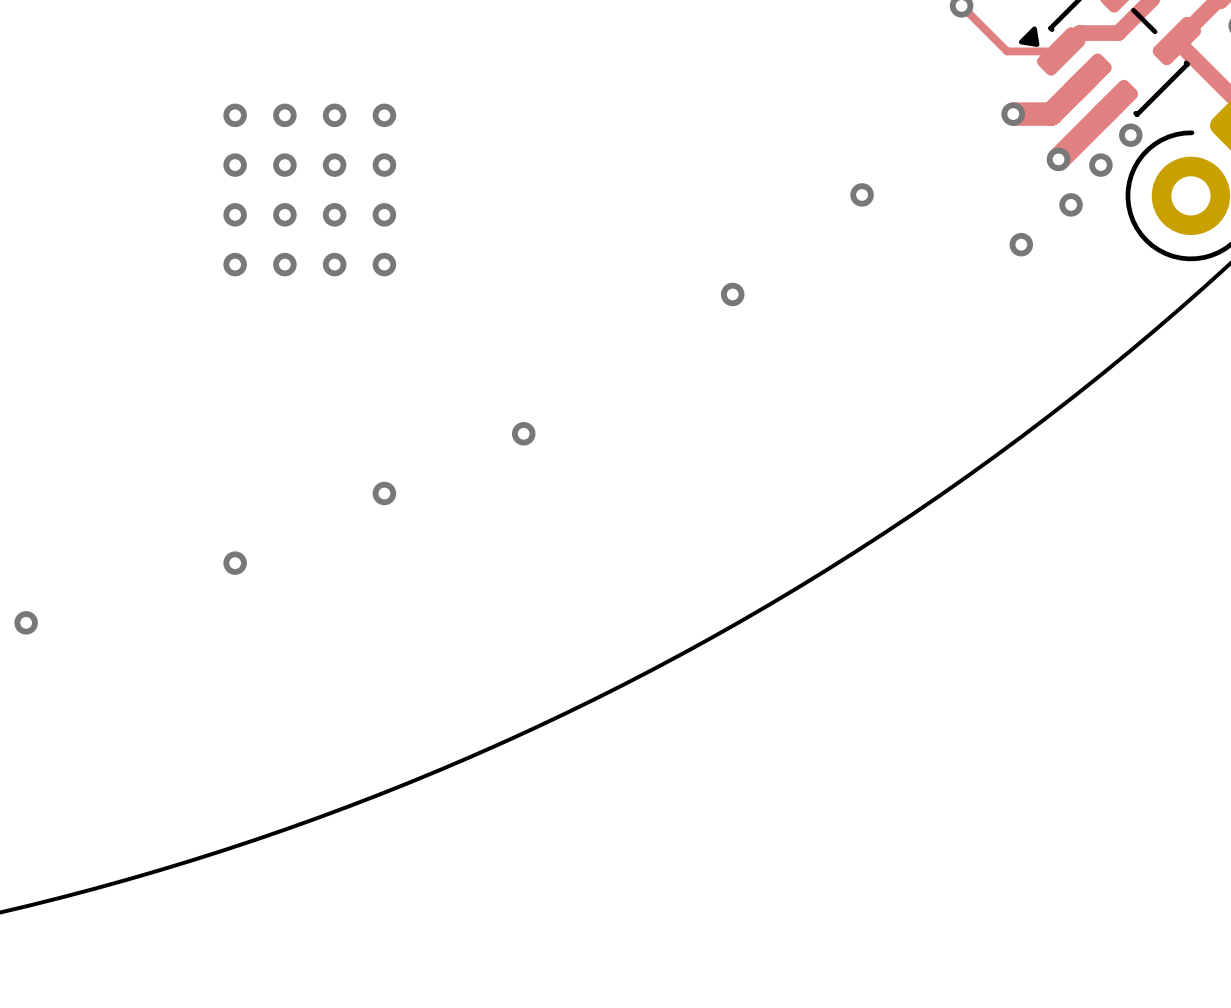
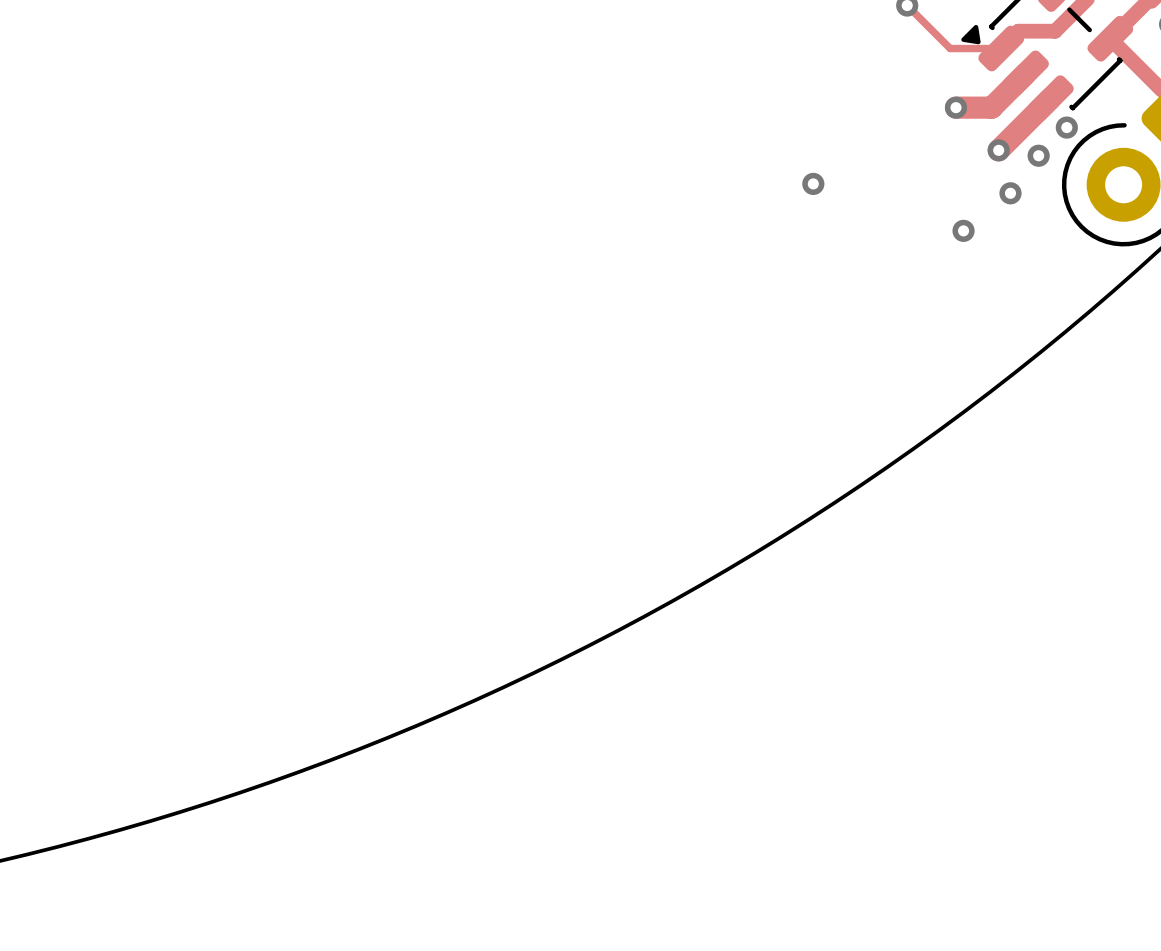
via: (235, 115) -> none
via: (284, 115) -> none
via: (334, 115) -> none
via: (384, 115) -> none
via: (235, 165) -> none
via: (284, 165) -> none
via: (334, 165) -> none
via: (384, 165) -> none
via: (235, 214) -> none
via: (284, 214) -> none
via: (334, 214) -> none
via: (384, 214) -> none
via: (235, 264) -> none
via: (284, 264) -> none
via: (334, 264) -> none
via: (384, 264) -> none
via: (732, 294) -> none
via: (523, 433) -> none
via: (384, 493) -> none
via: (235, 563) -> none
via: (26, 622) -> none

